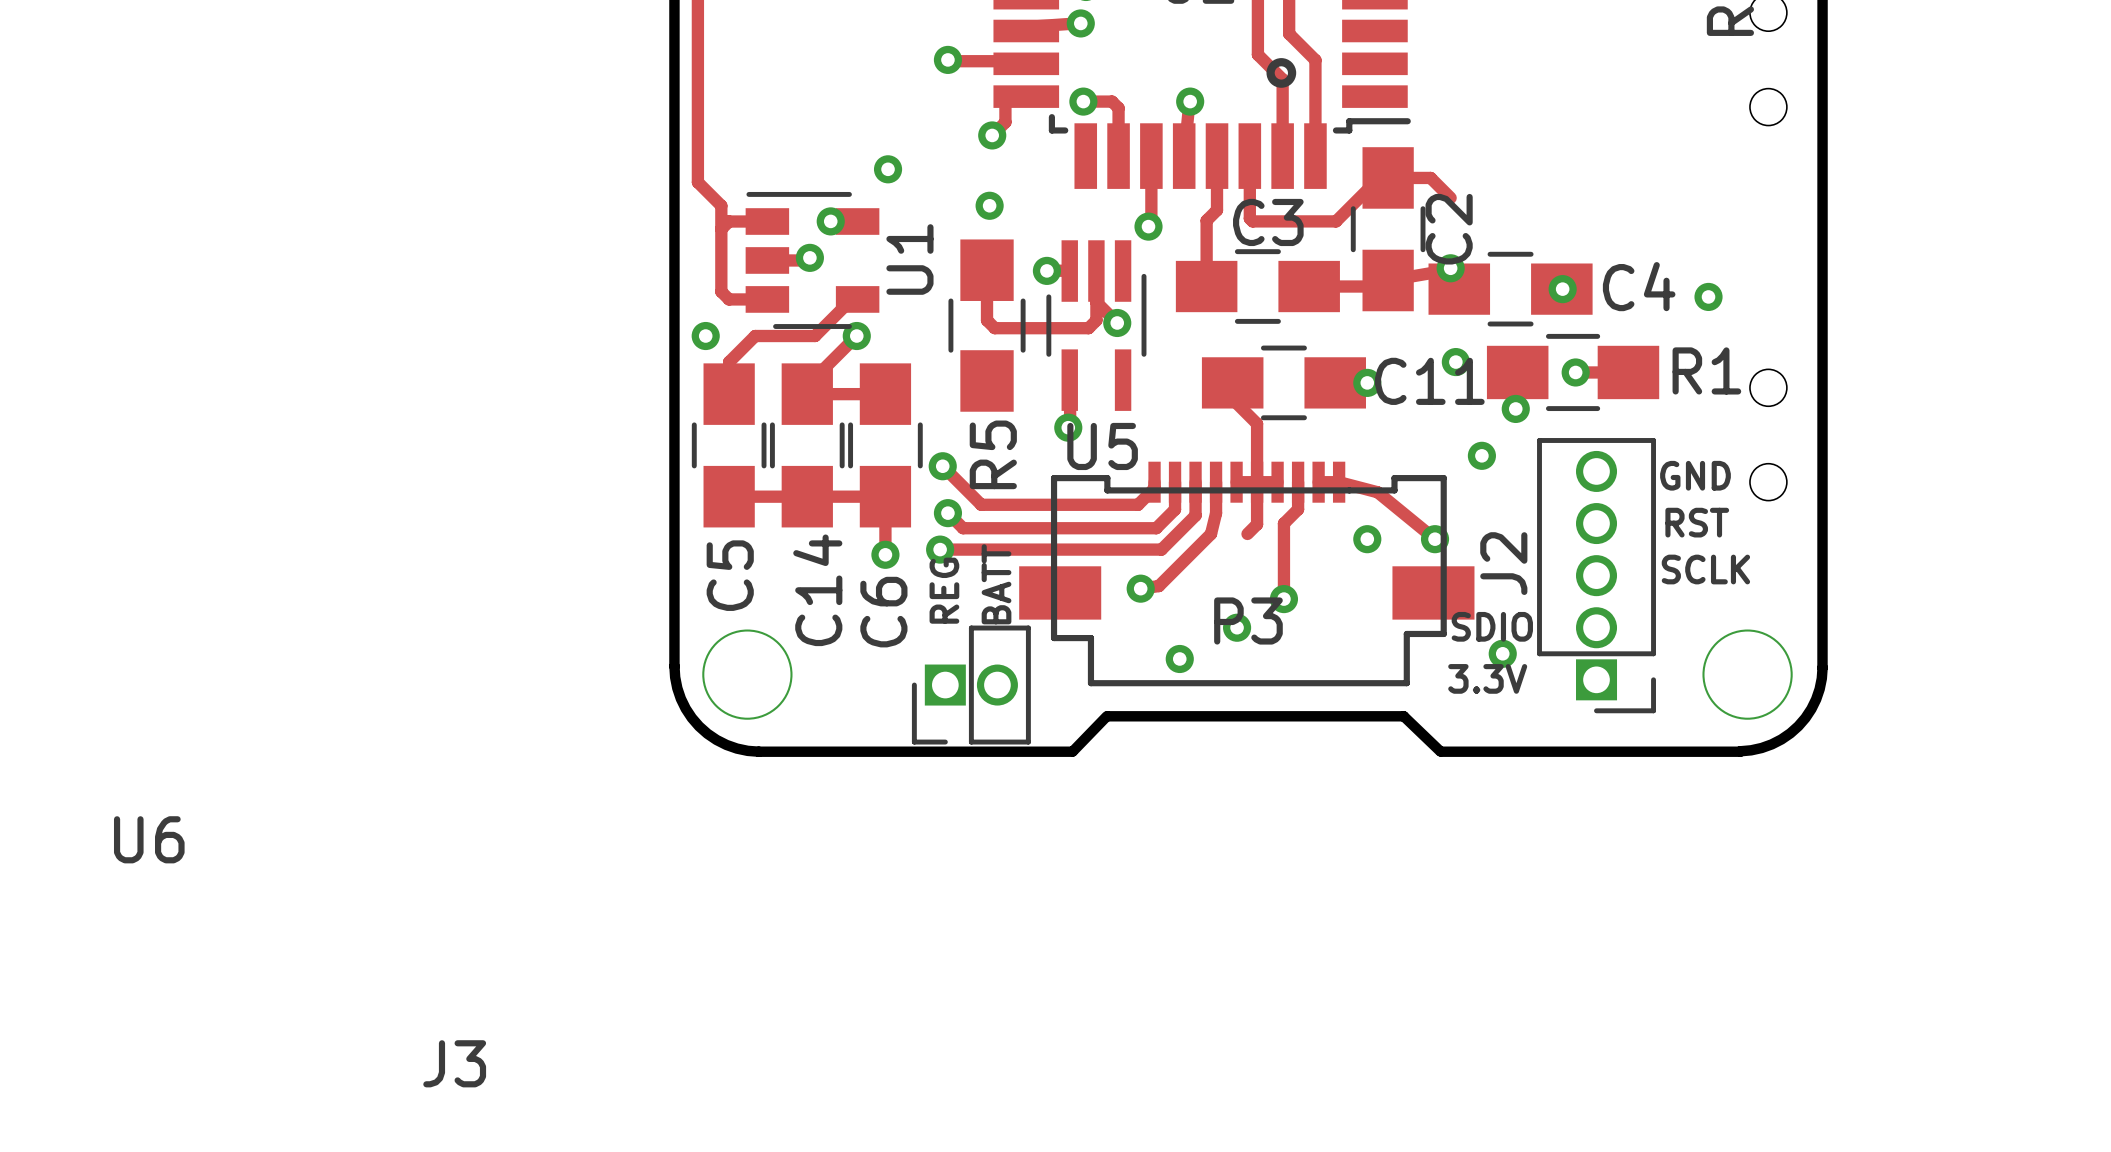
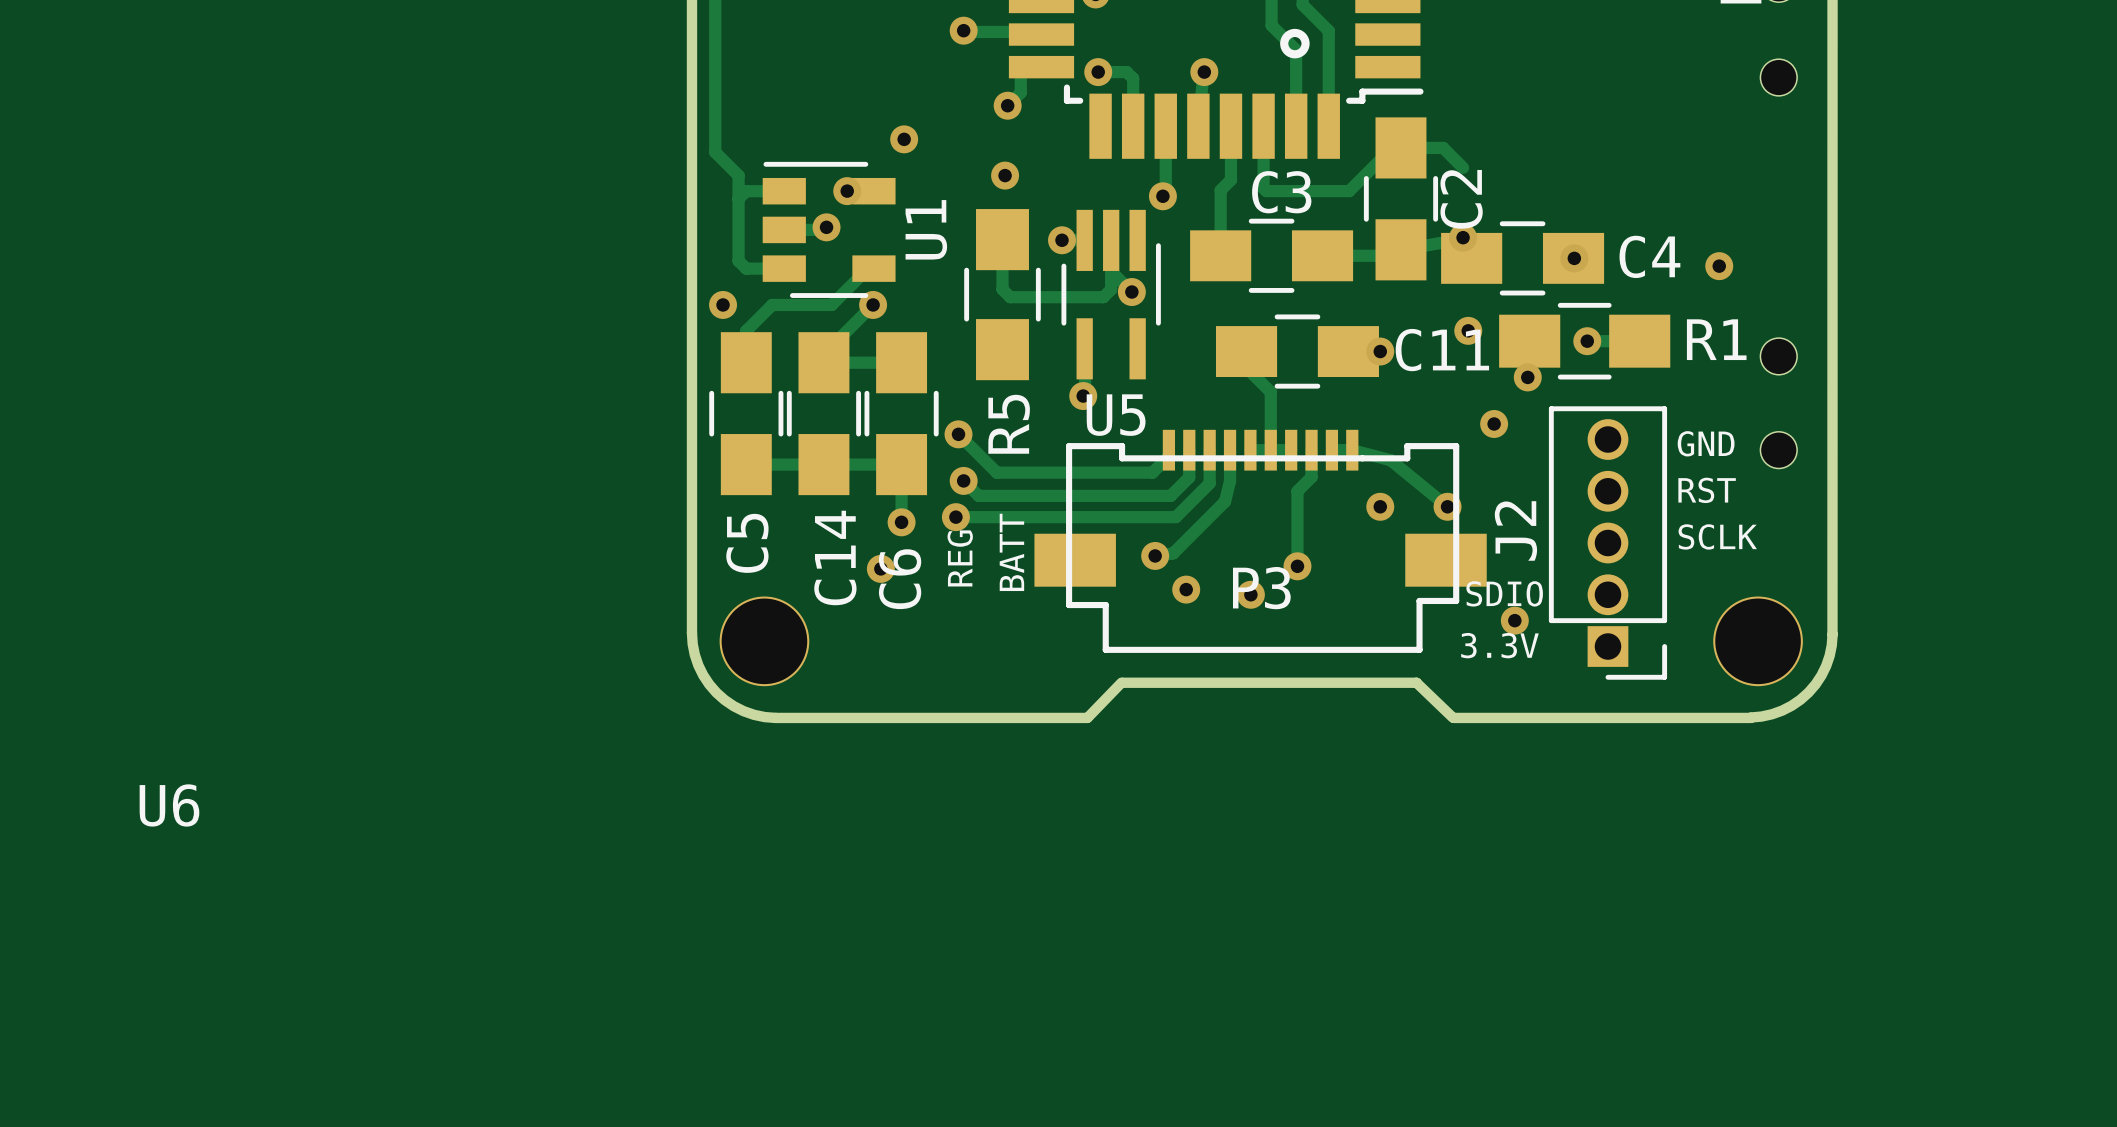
track: (1257, 482) (1257, 524) (1247, 533) -> none
via: none -> (880, 568)
via position: (1179, 658) -> (1186, 589)
J3: (971, 685) -> none

